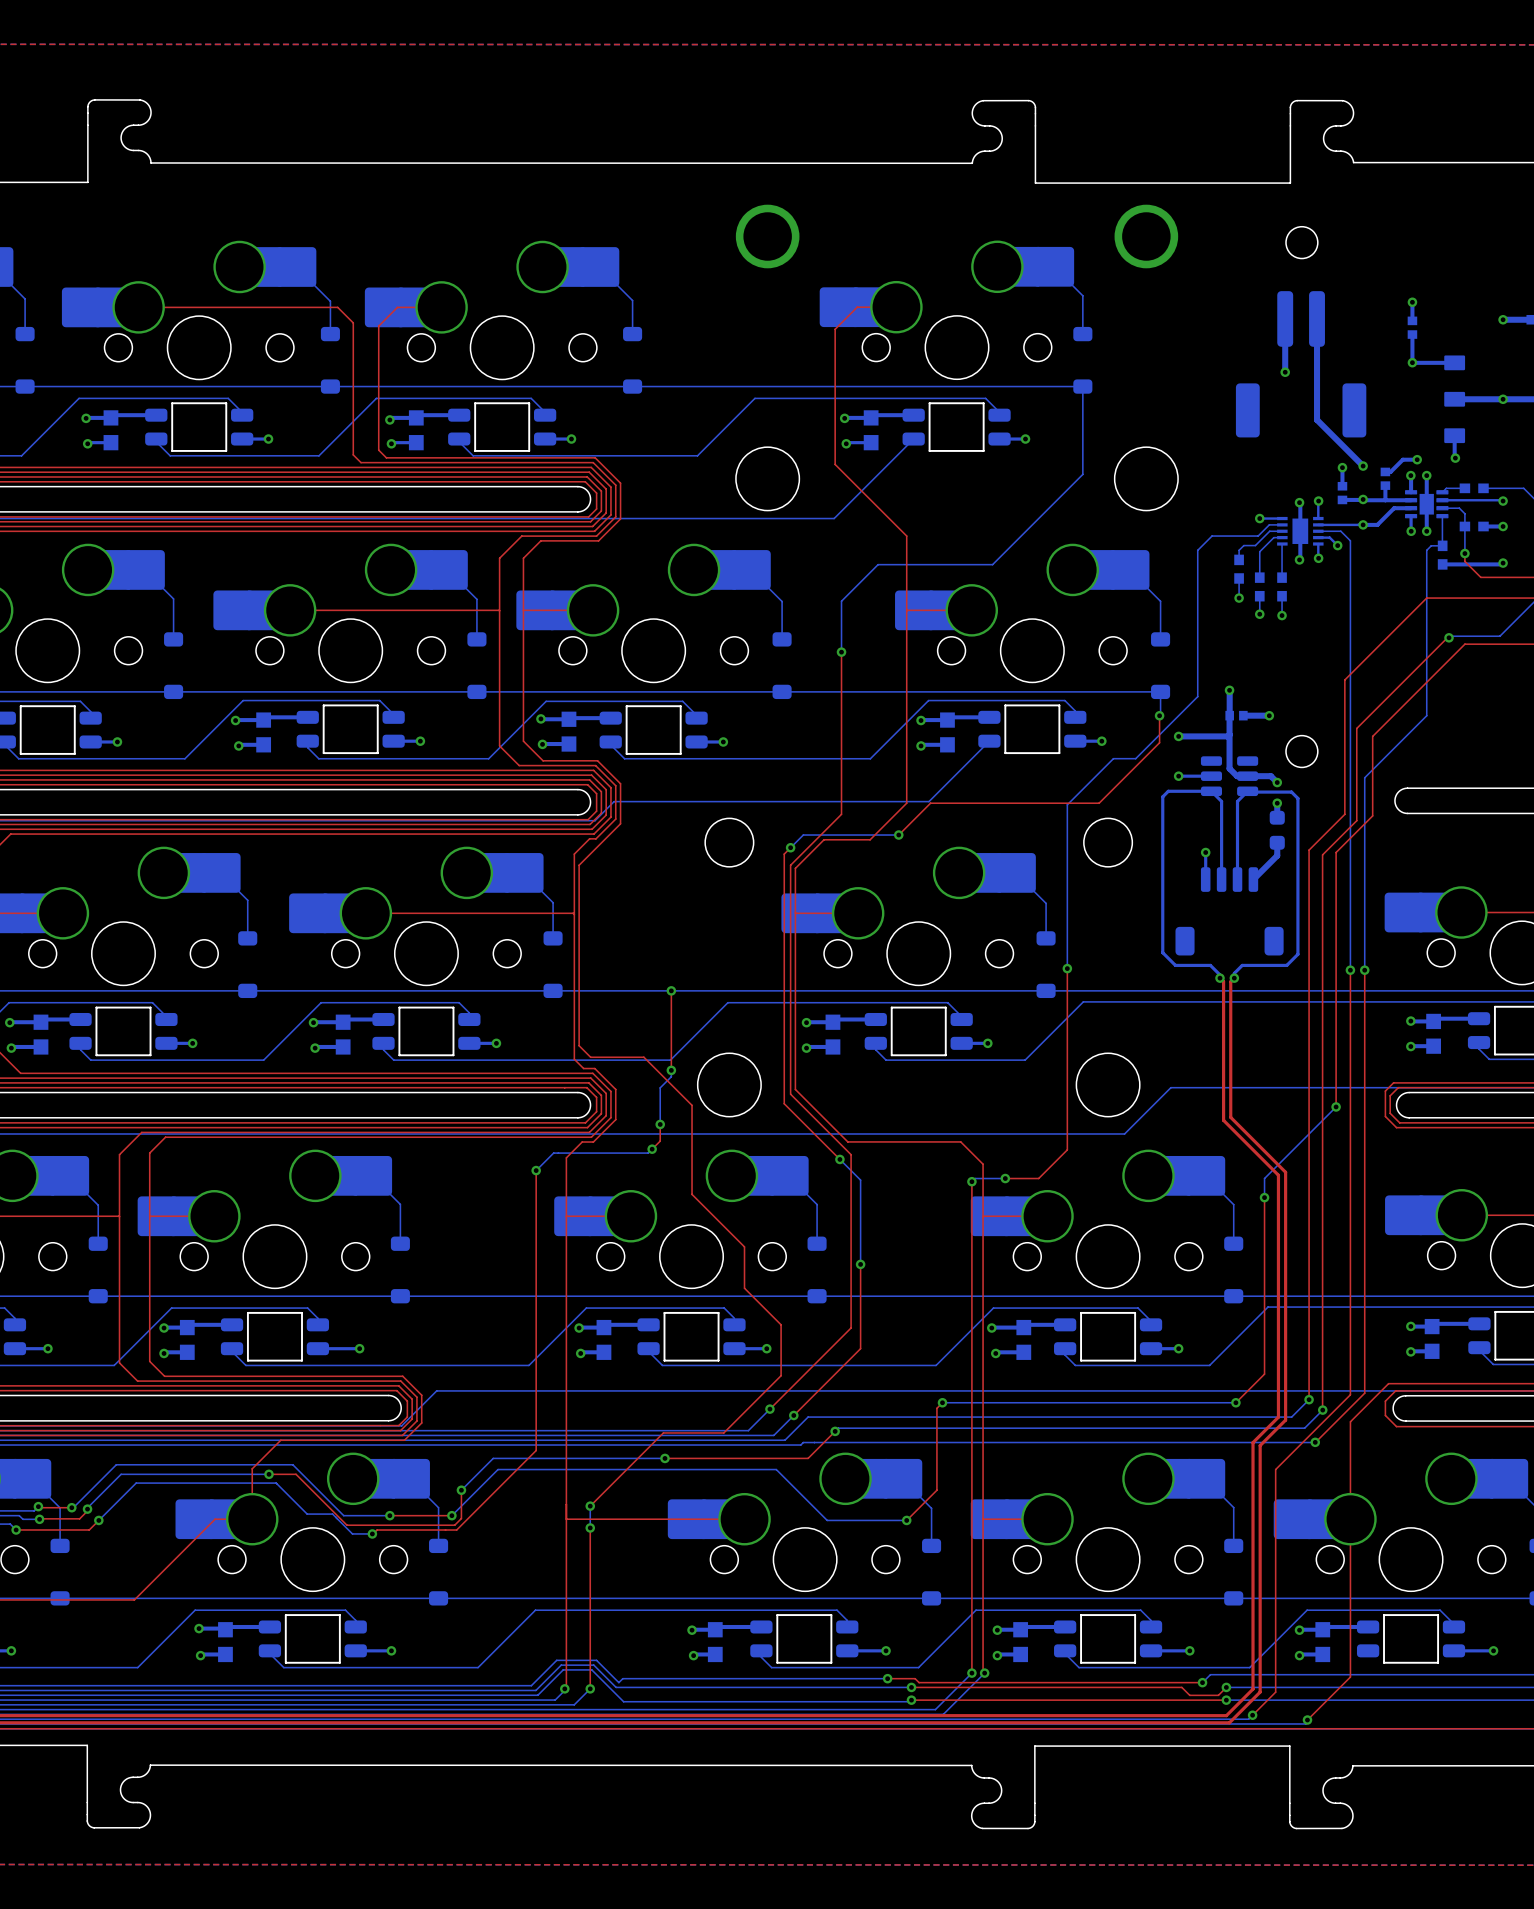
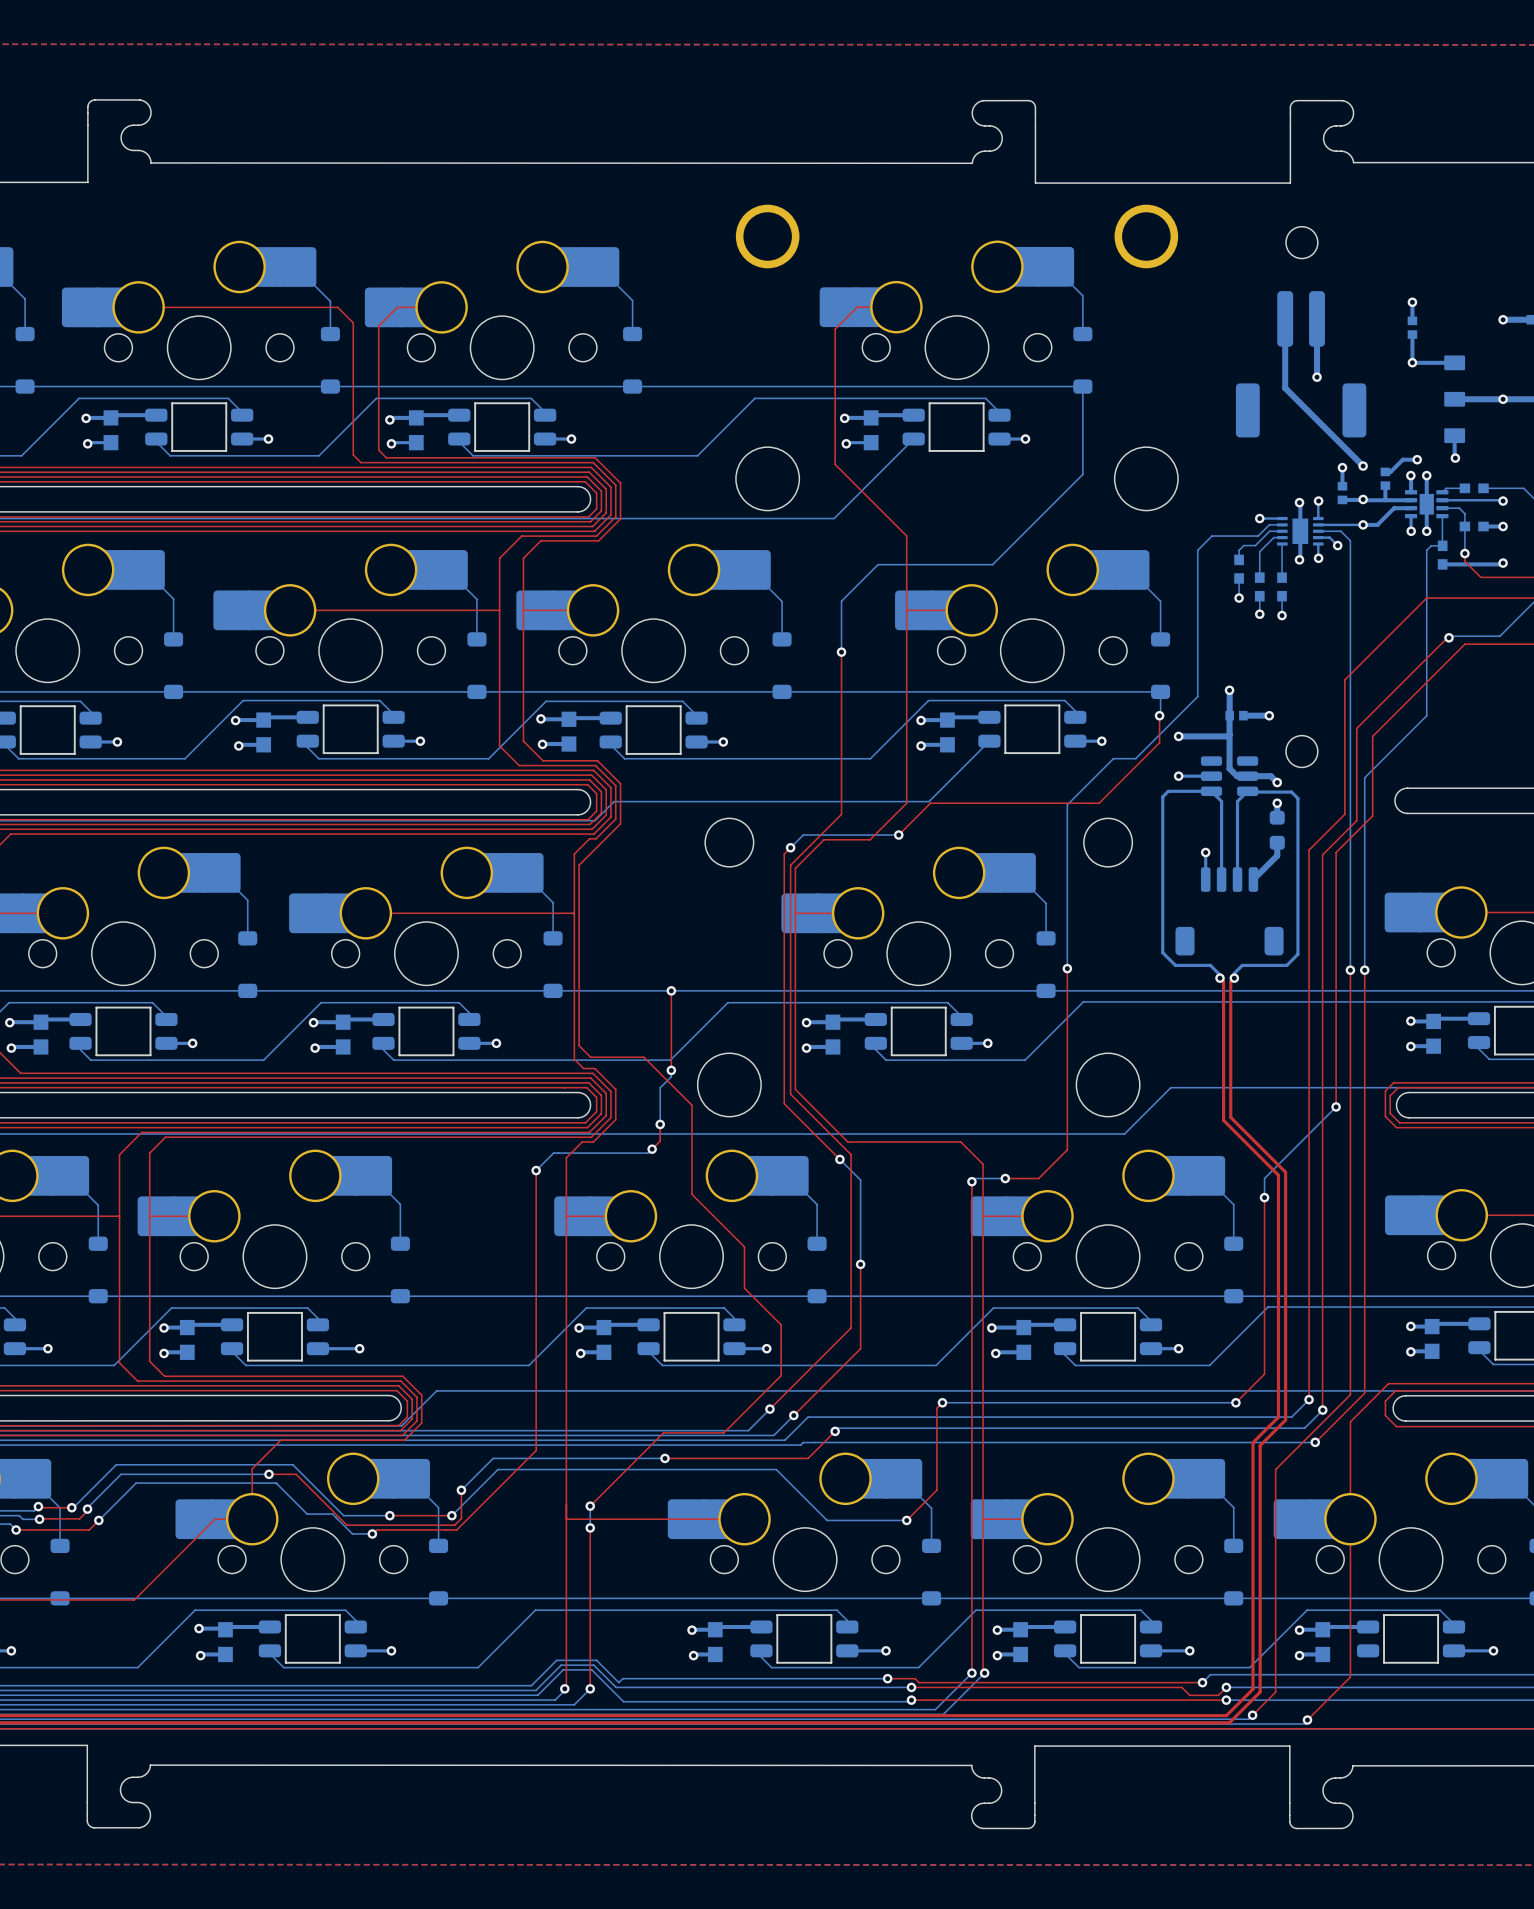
via position: (1285, 372) -> (1317, 377)
bottom track: (1317, 377) (1317, 419) -> (1285, 372) (1285, 388) (1317, 419)

